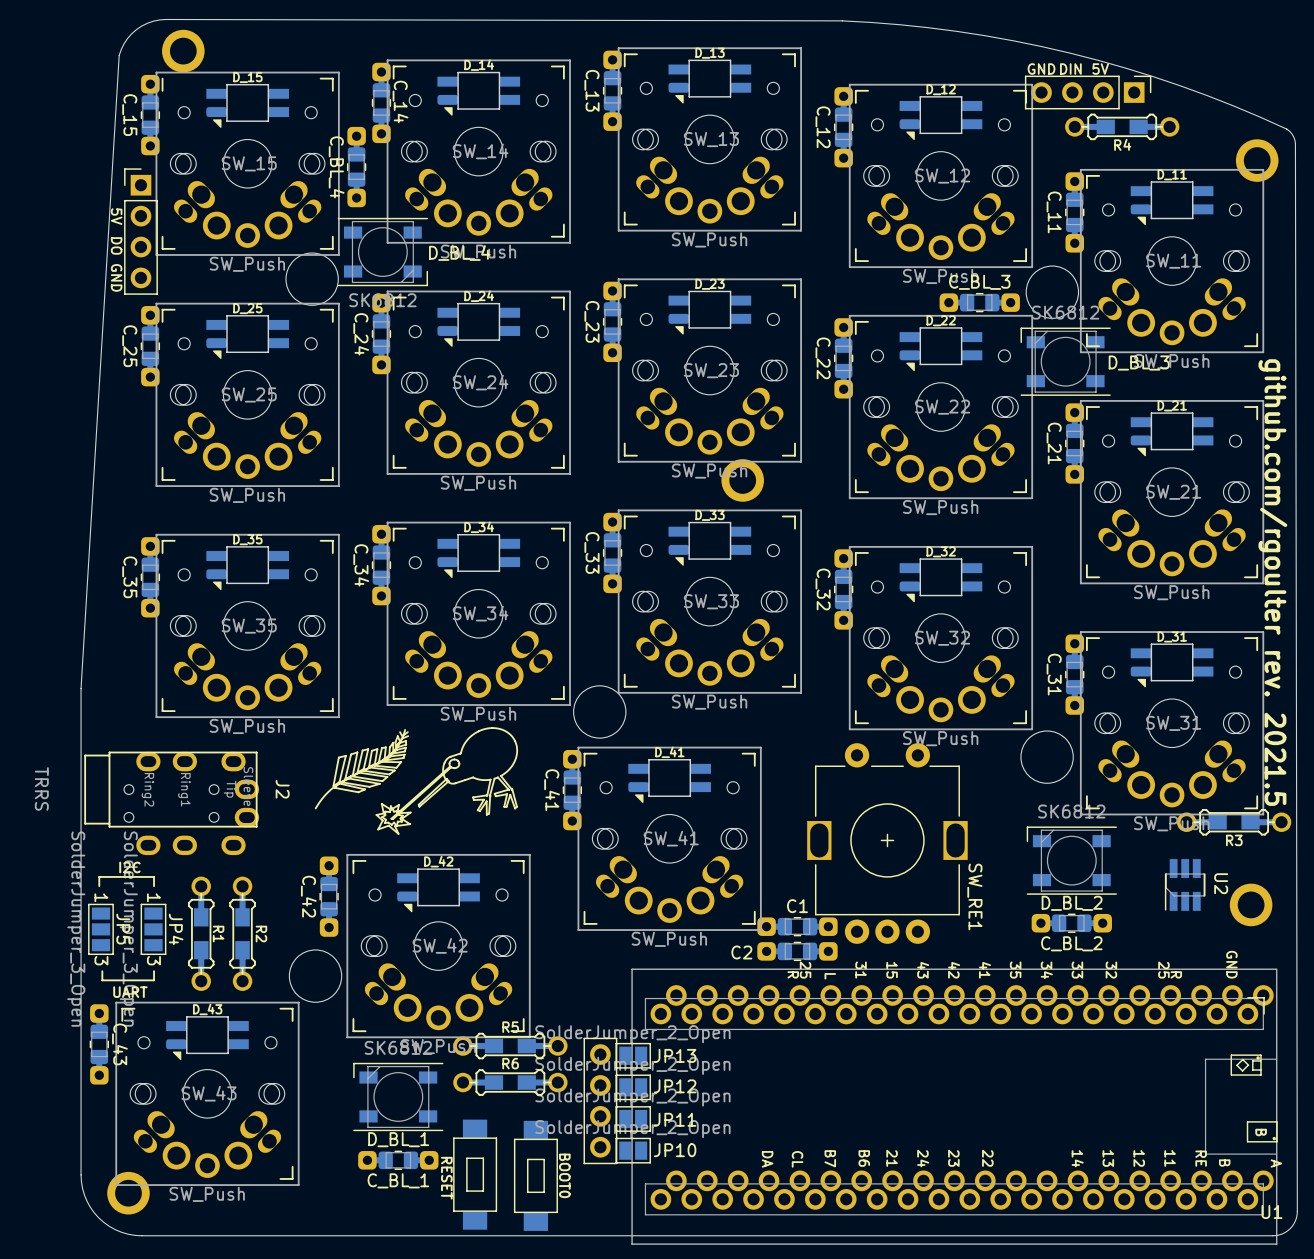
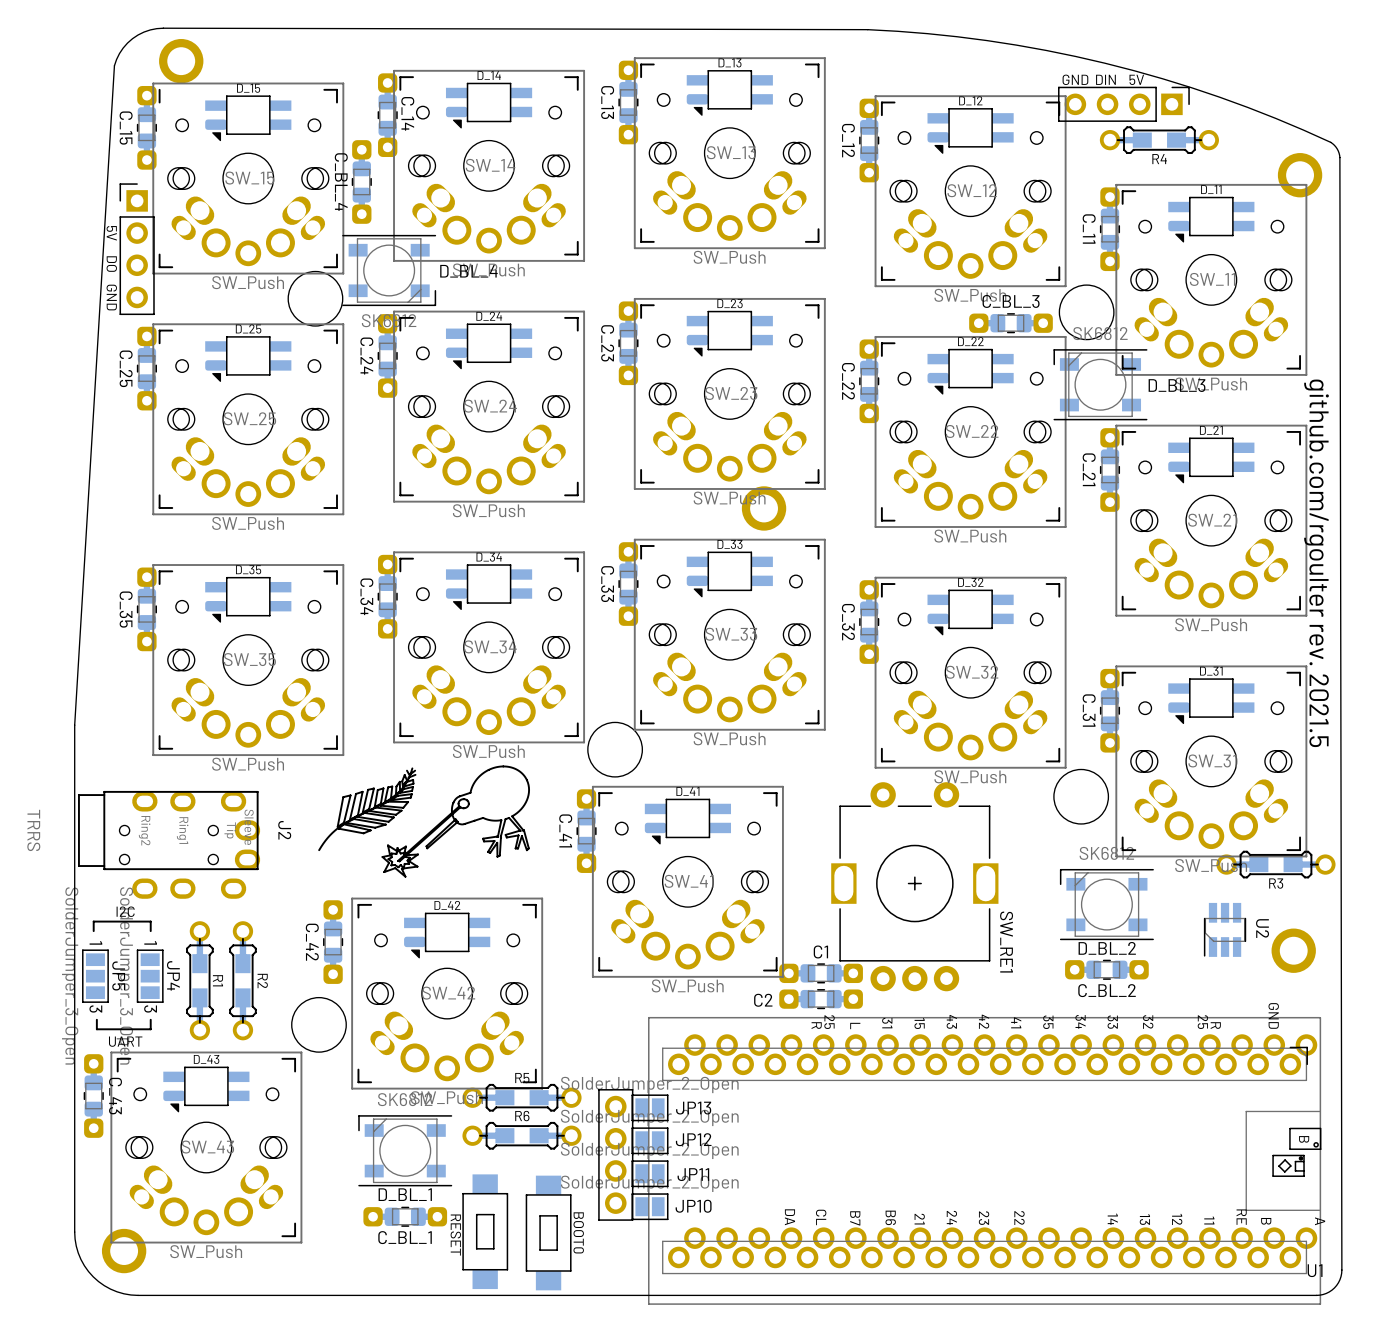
U1 footprint: [631, 968, 1278, 1245] -> [648, 1016, 1322, 1305]

